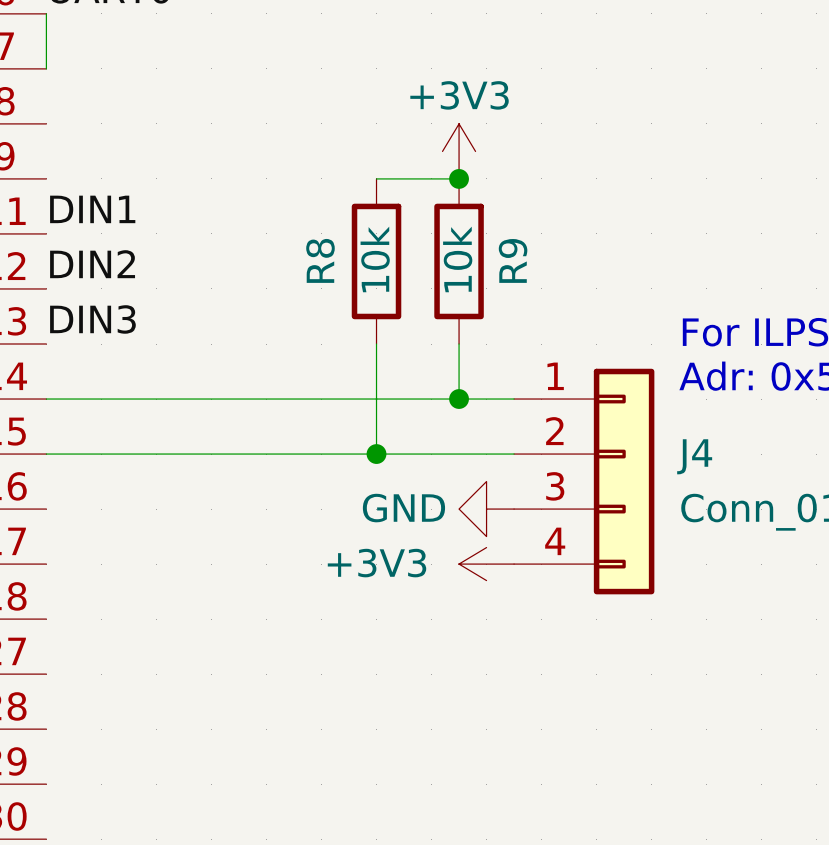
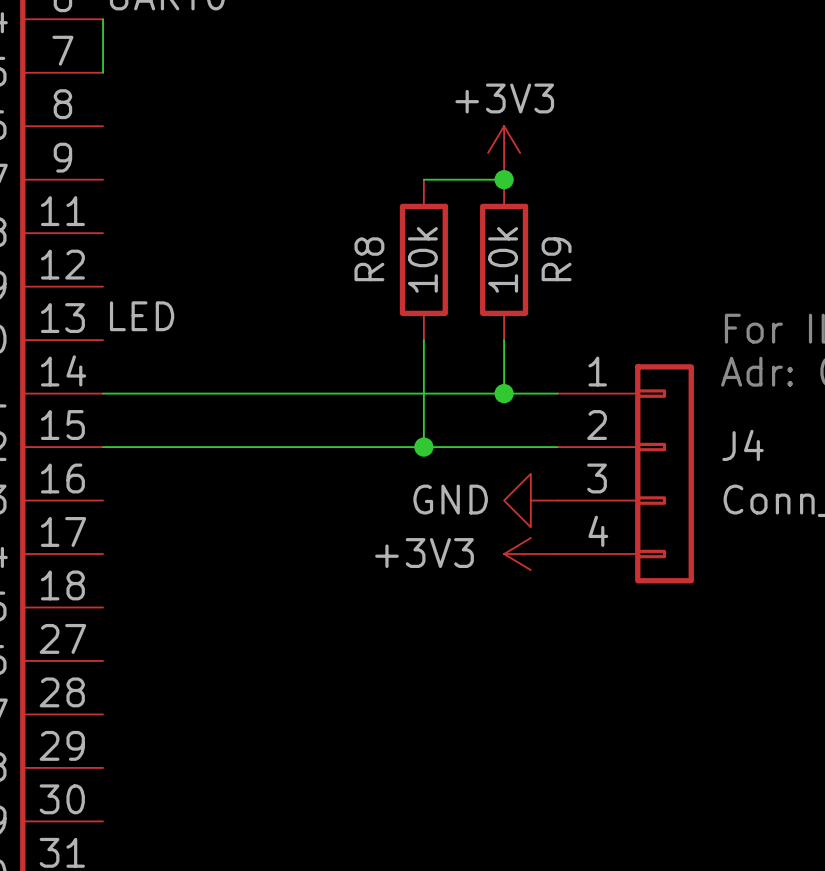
label: DIN1 (92, 209) -> none
label: DIN2 (92, 264) -> none
label: DIN3 (92, 319) -> LED (142, 316)

